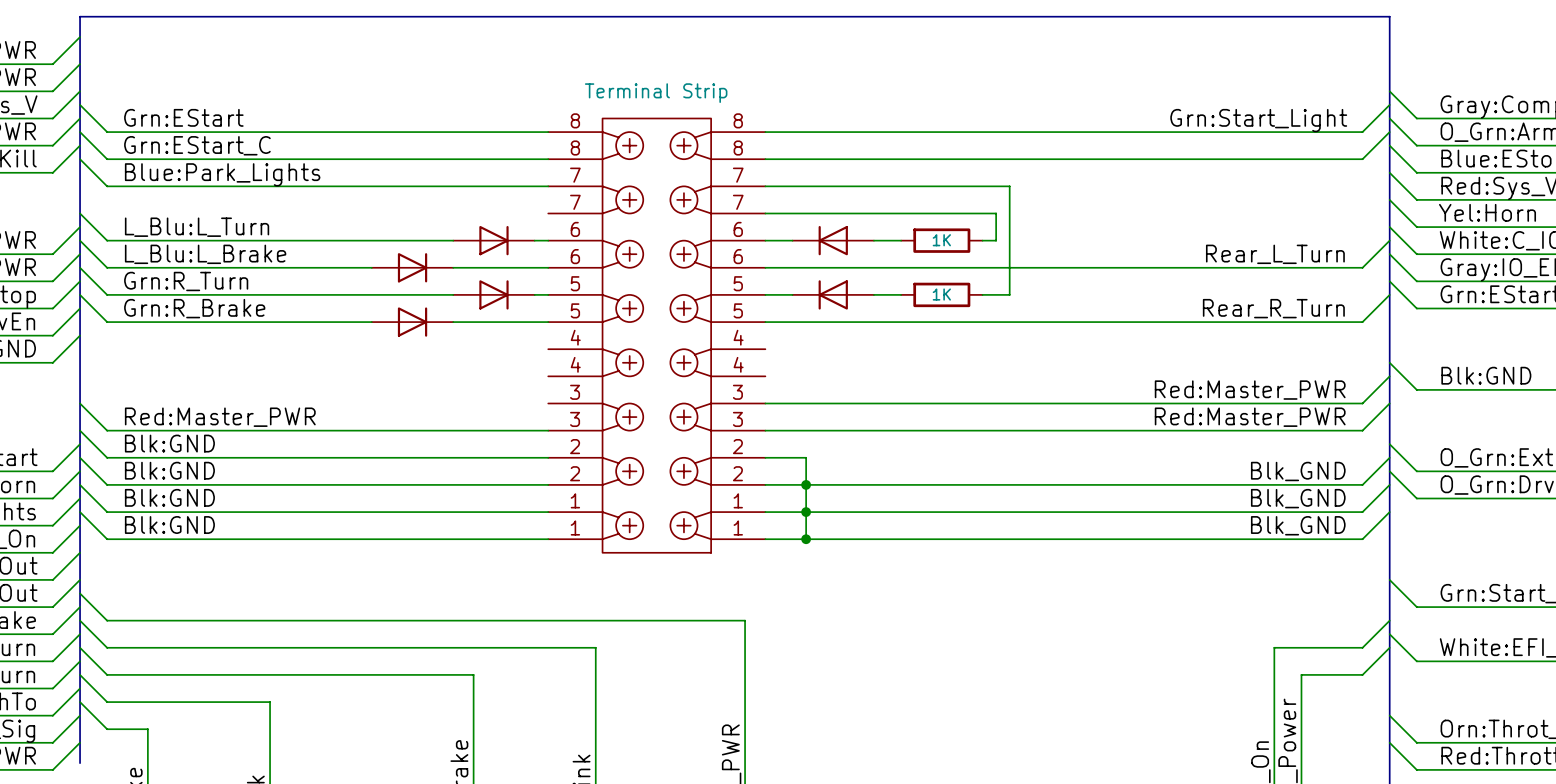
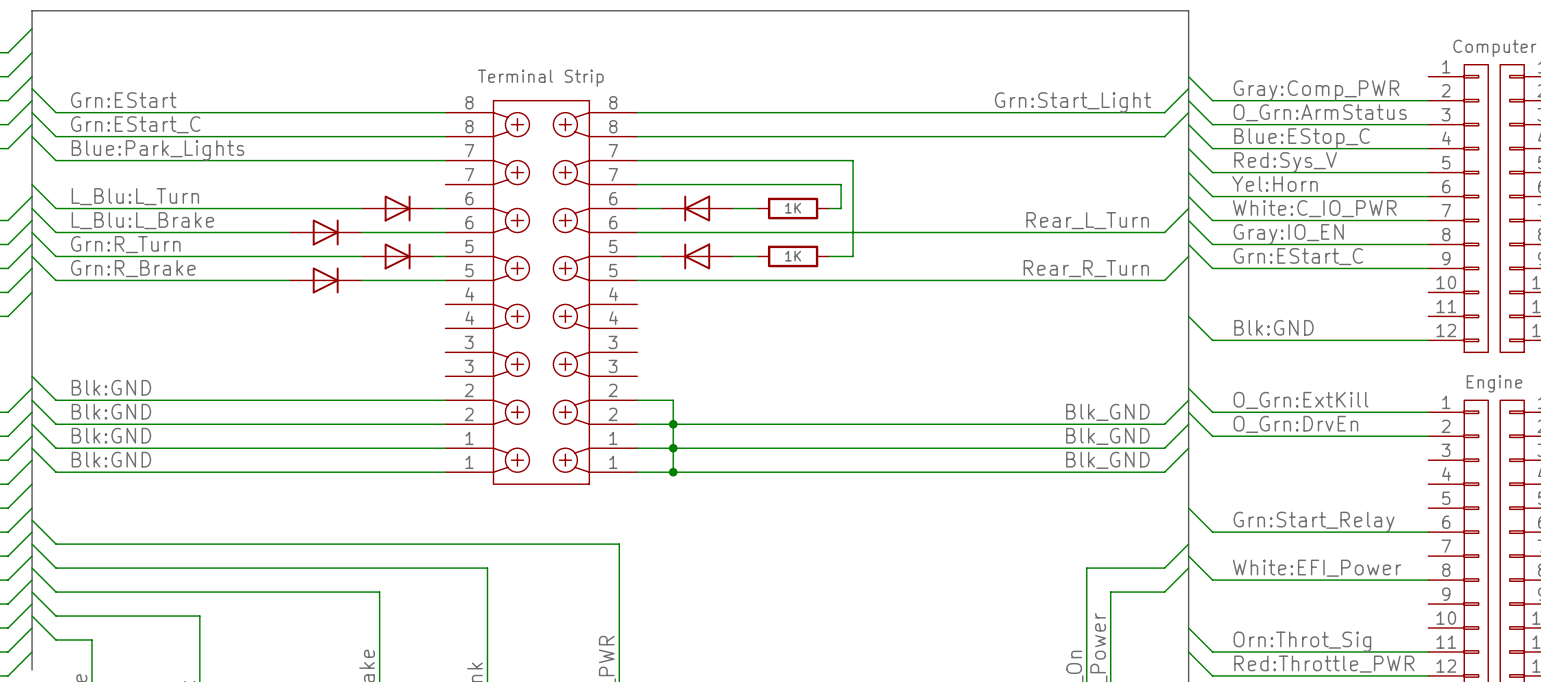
wire: (1389, 376) (1362, 403) (765, 403) -> none
label: Red:Master_PWR (1250, 390) -> none
wire: (80, 403) (107, 430) (548, 430) -> none
wire: (1389, 403) (1362, 430) (765, 430) -> none
label: Red:Master_PWR (220, 417) -> none
label: Red:Master_PWR (1250, 417) -> none

